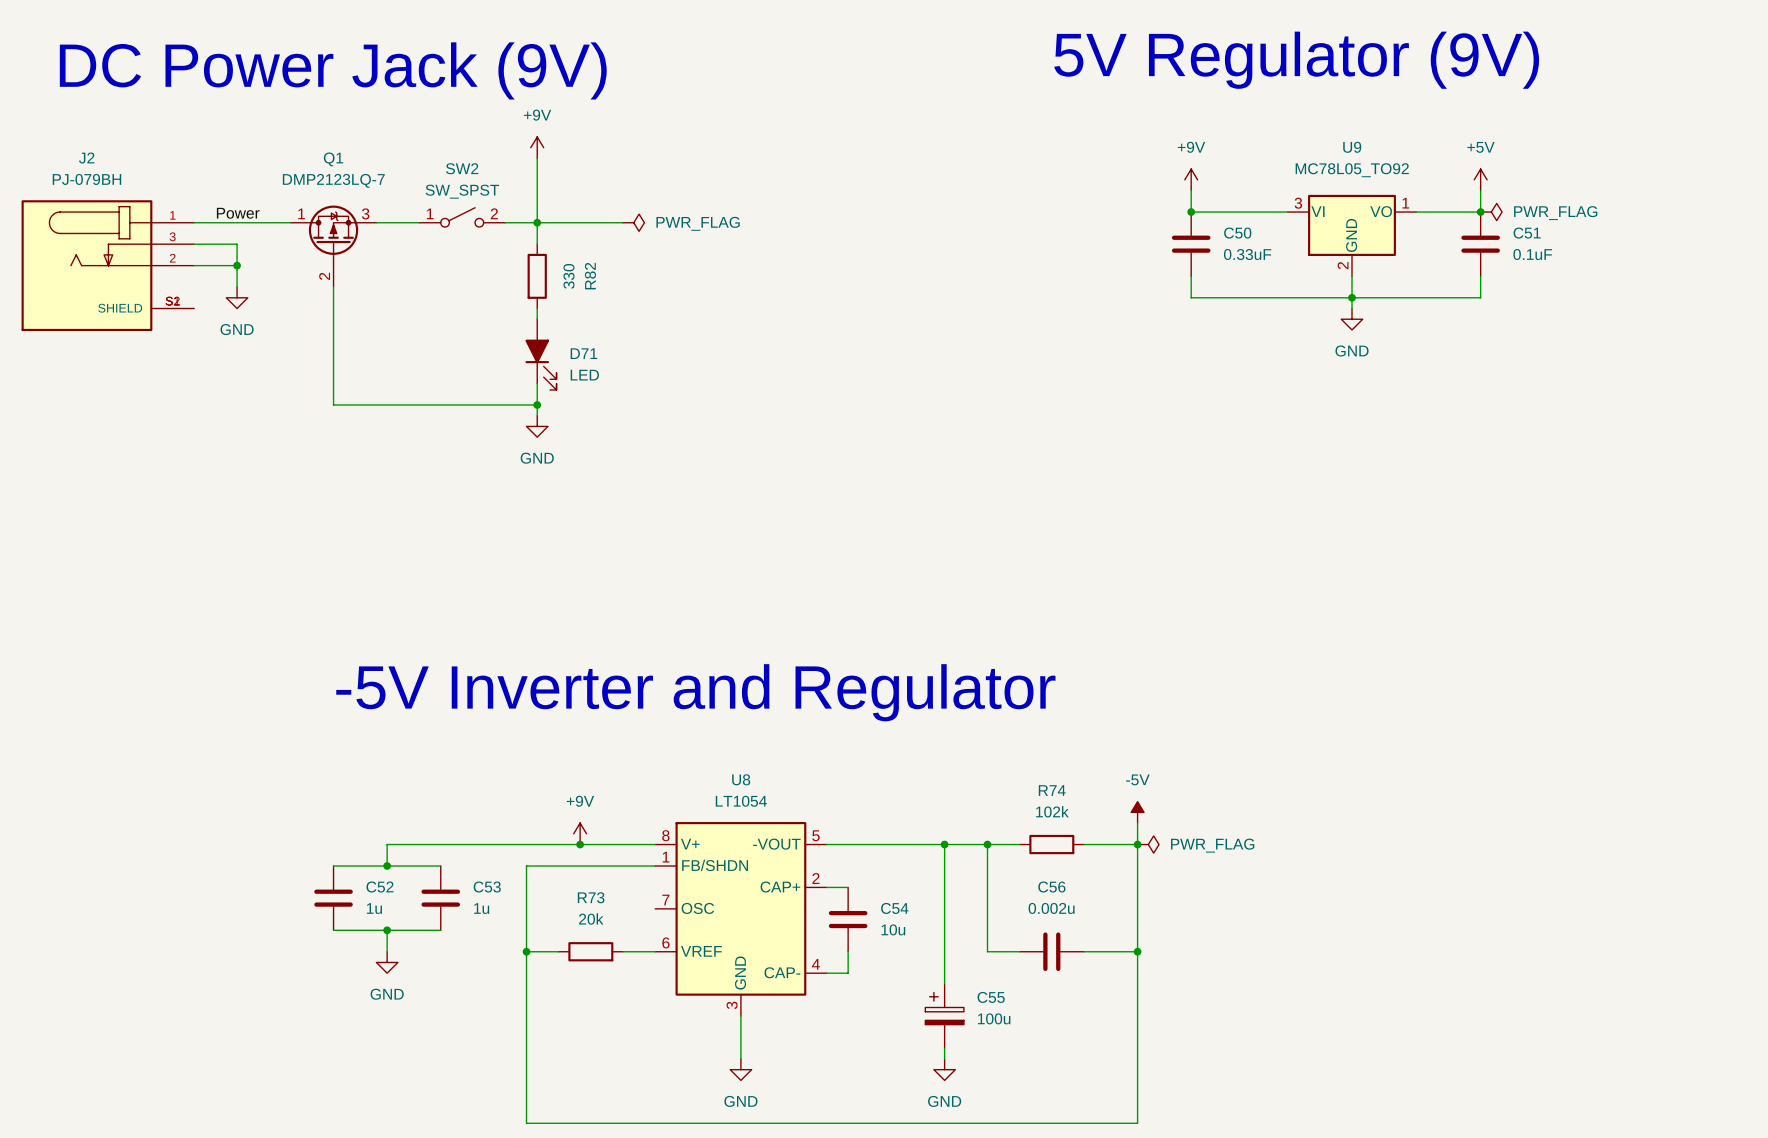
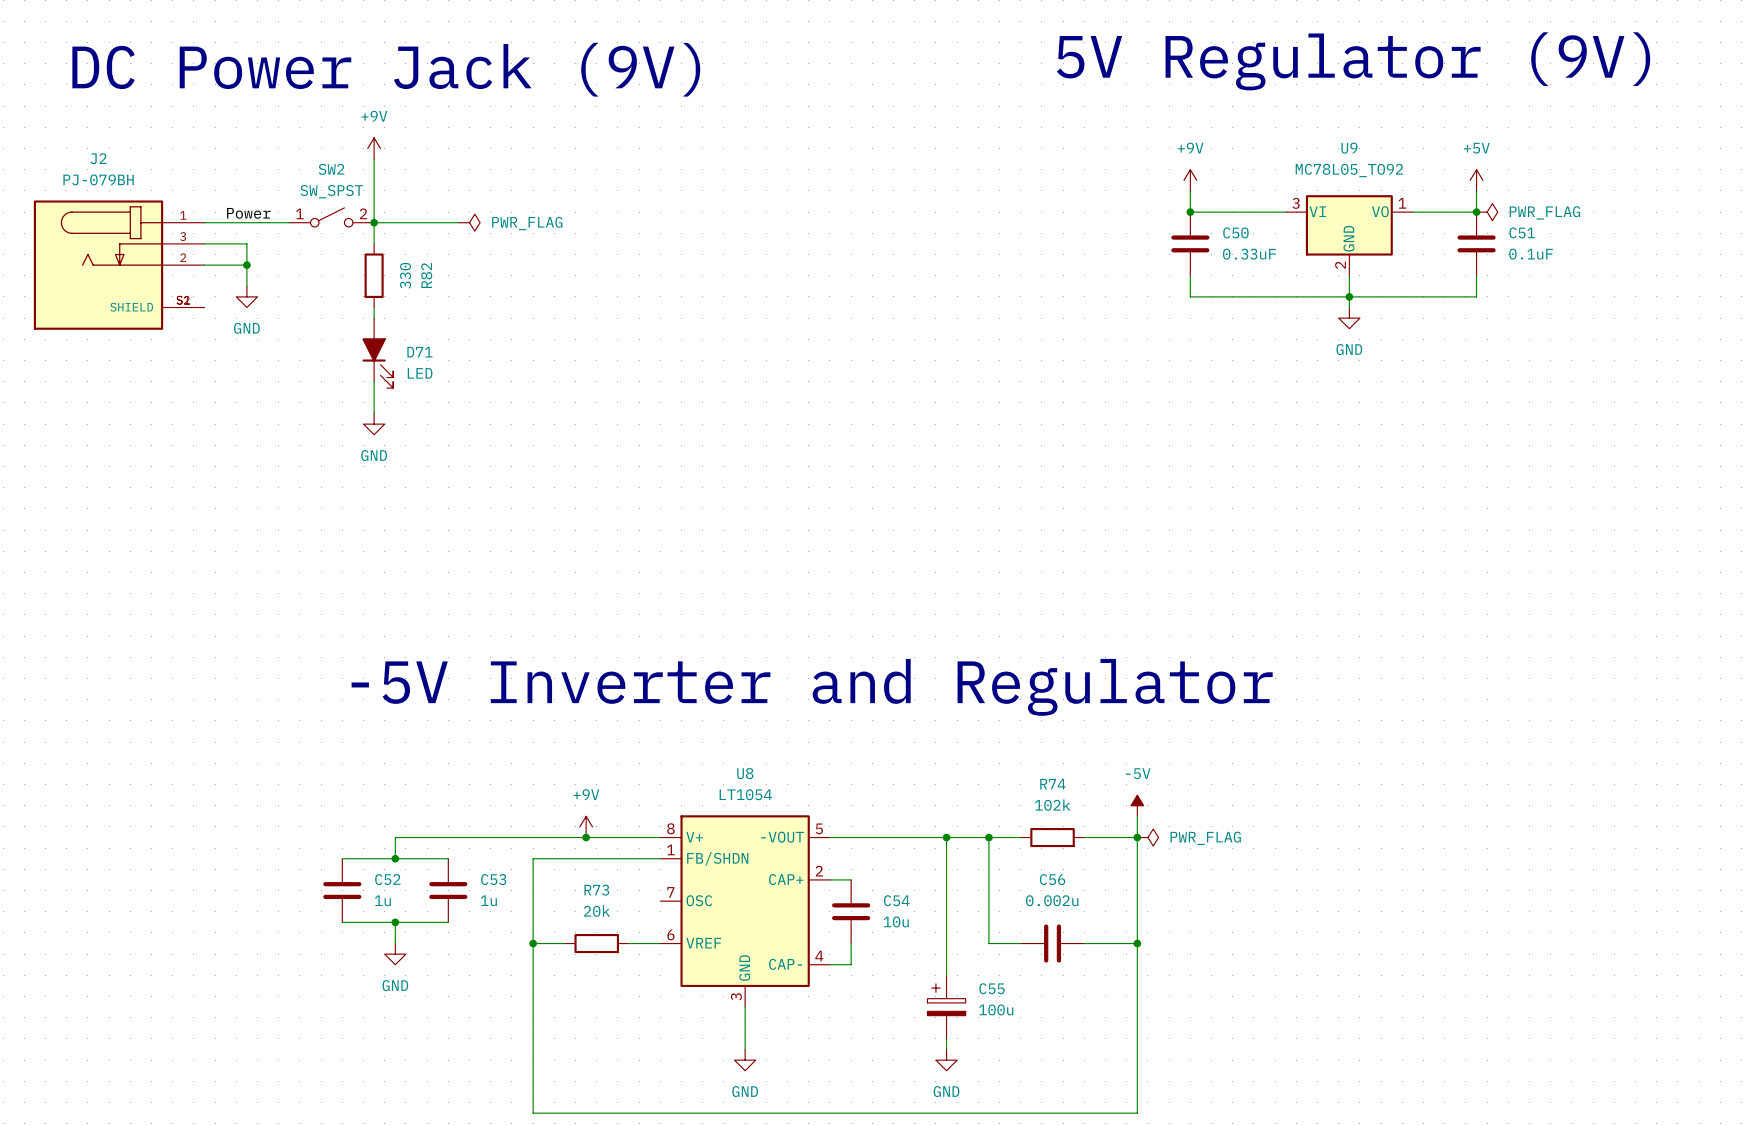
power symbol position: +9V (537, 147) -> +9V (374, 148)
wire: (537, 158) (537, 244) -> (374, 159) (374, 243)
SW2 position: (462, 217) -> (331, 217)
junction: none -> (374, 222)
wire: (505, 222) (623, 222) -> none
junction: (537, 222) -> none
power symbol position: PWR_FLAG (633, 222) -> PWR_FLAG (469, 222)
Q1: DMP2123LQ-7 (333, 246) -> none
R82 position: (537, 276) -> (374, 275)
wire: (333, 287) (333, 404) (537, 404) -> none
wire: (537, 308) (537, 319) -> (374, 307) (374, 318)
D71 position: (540, 354) -> (377, 353)
wire: (537, 383) (537, 415) -> (374, 381) (374, 413)
junction: (537, 404) -> none
power symbol position: GND (537, 426) -> GND (374, 424)

